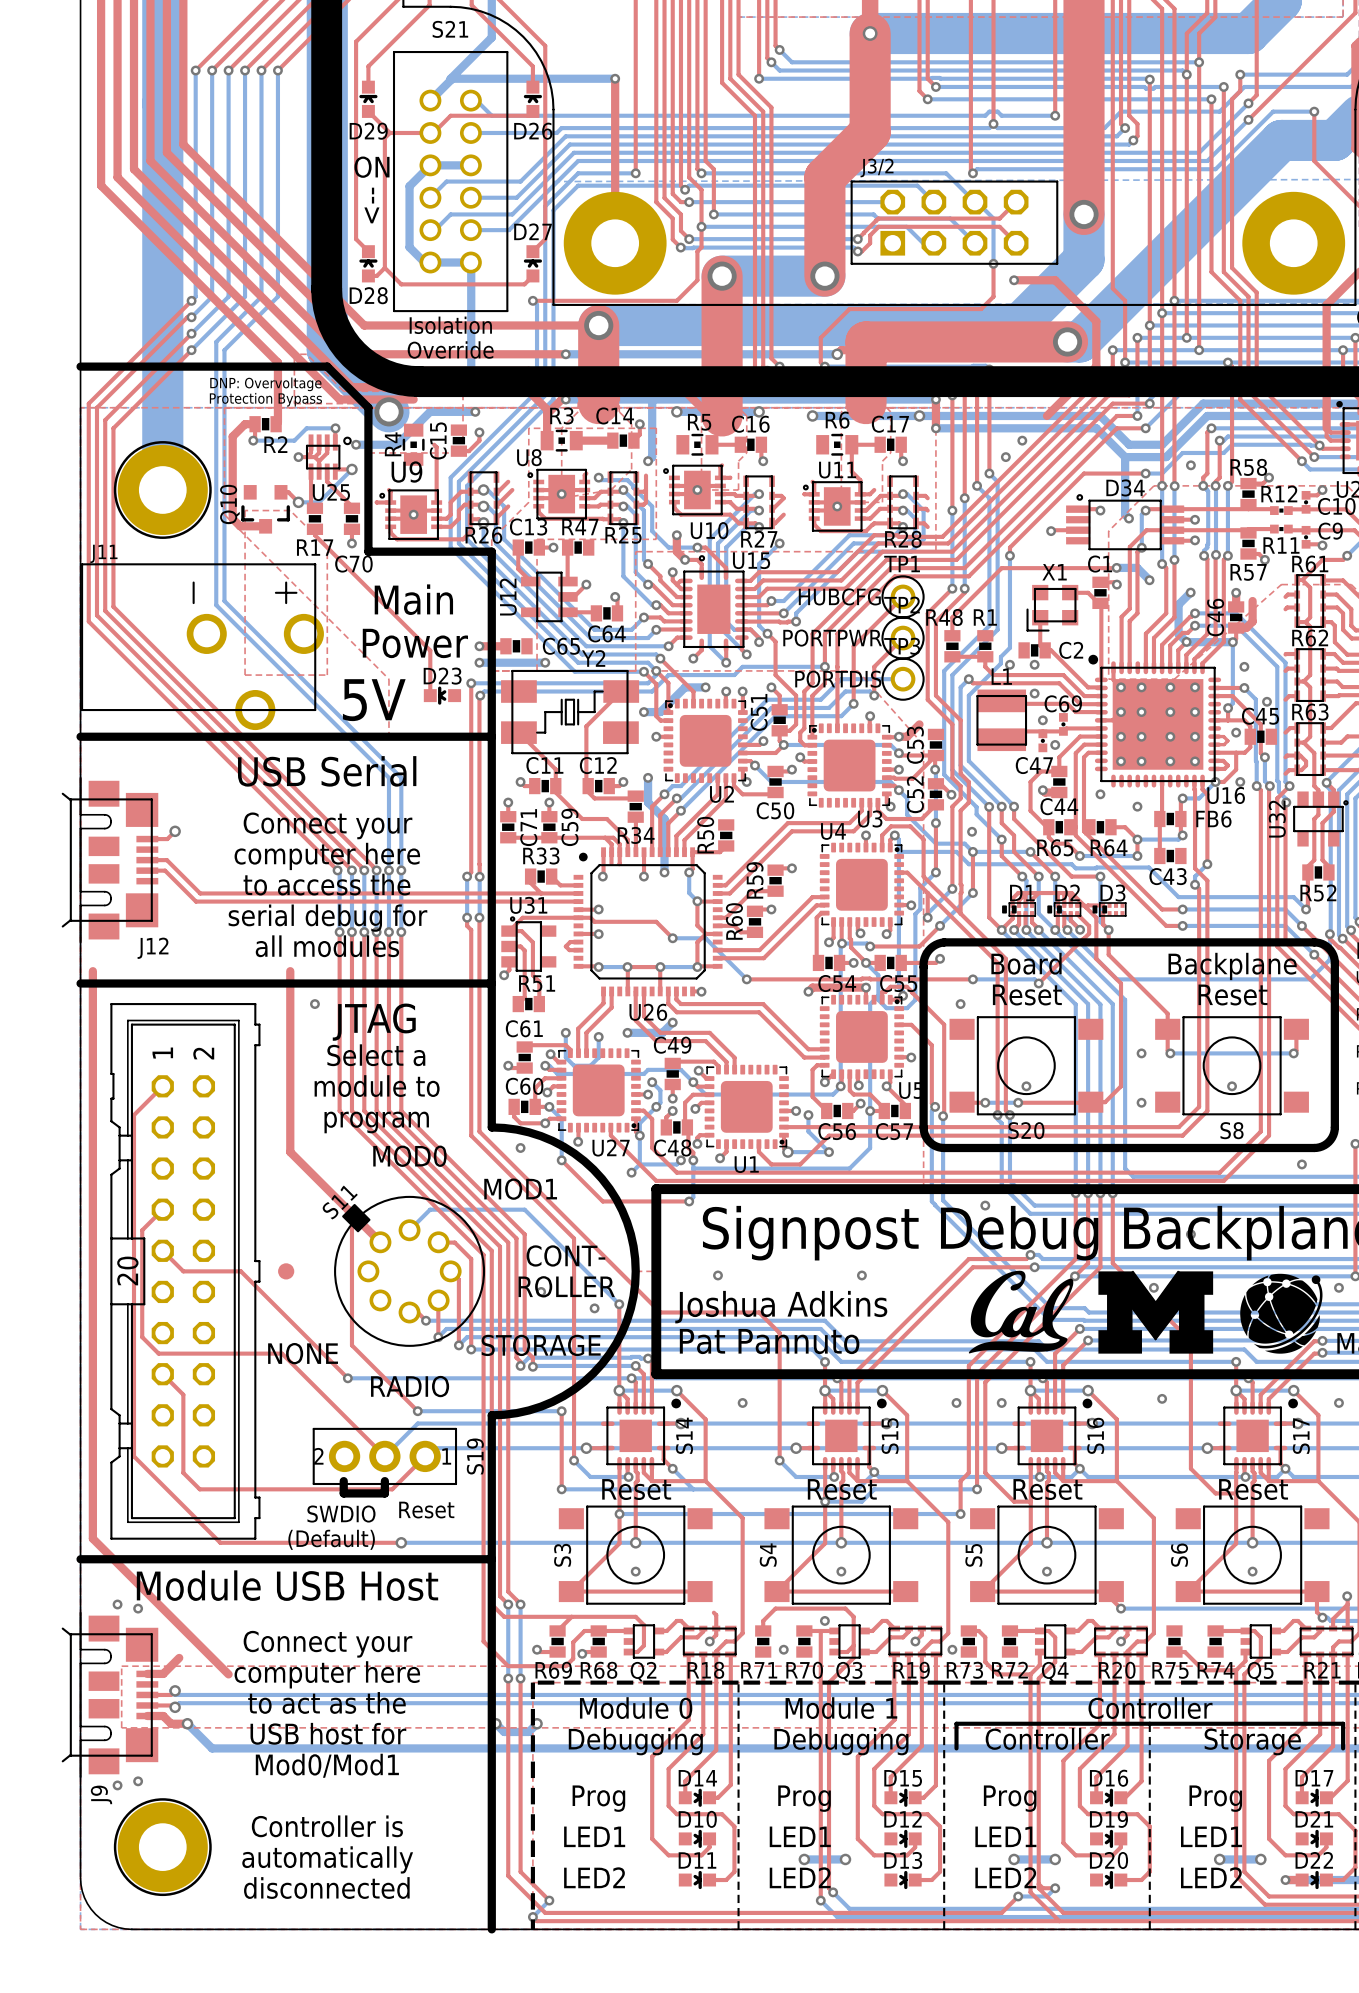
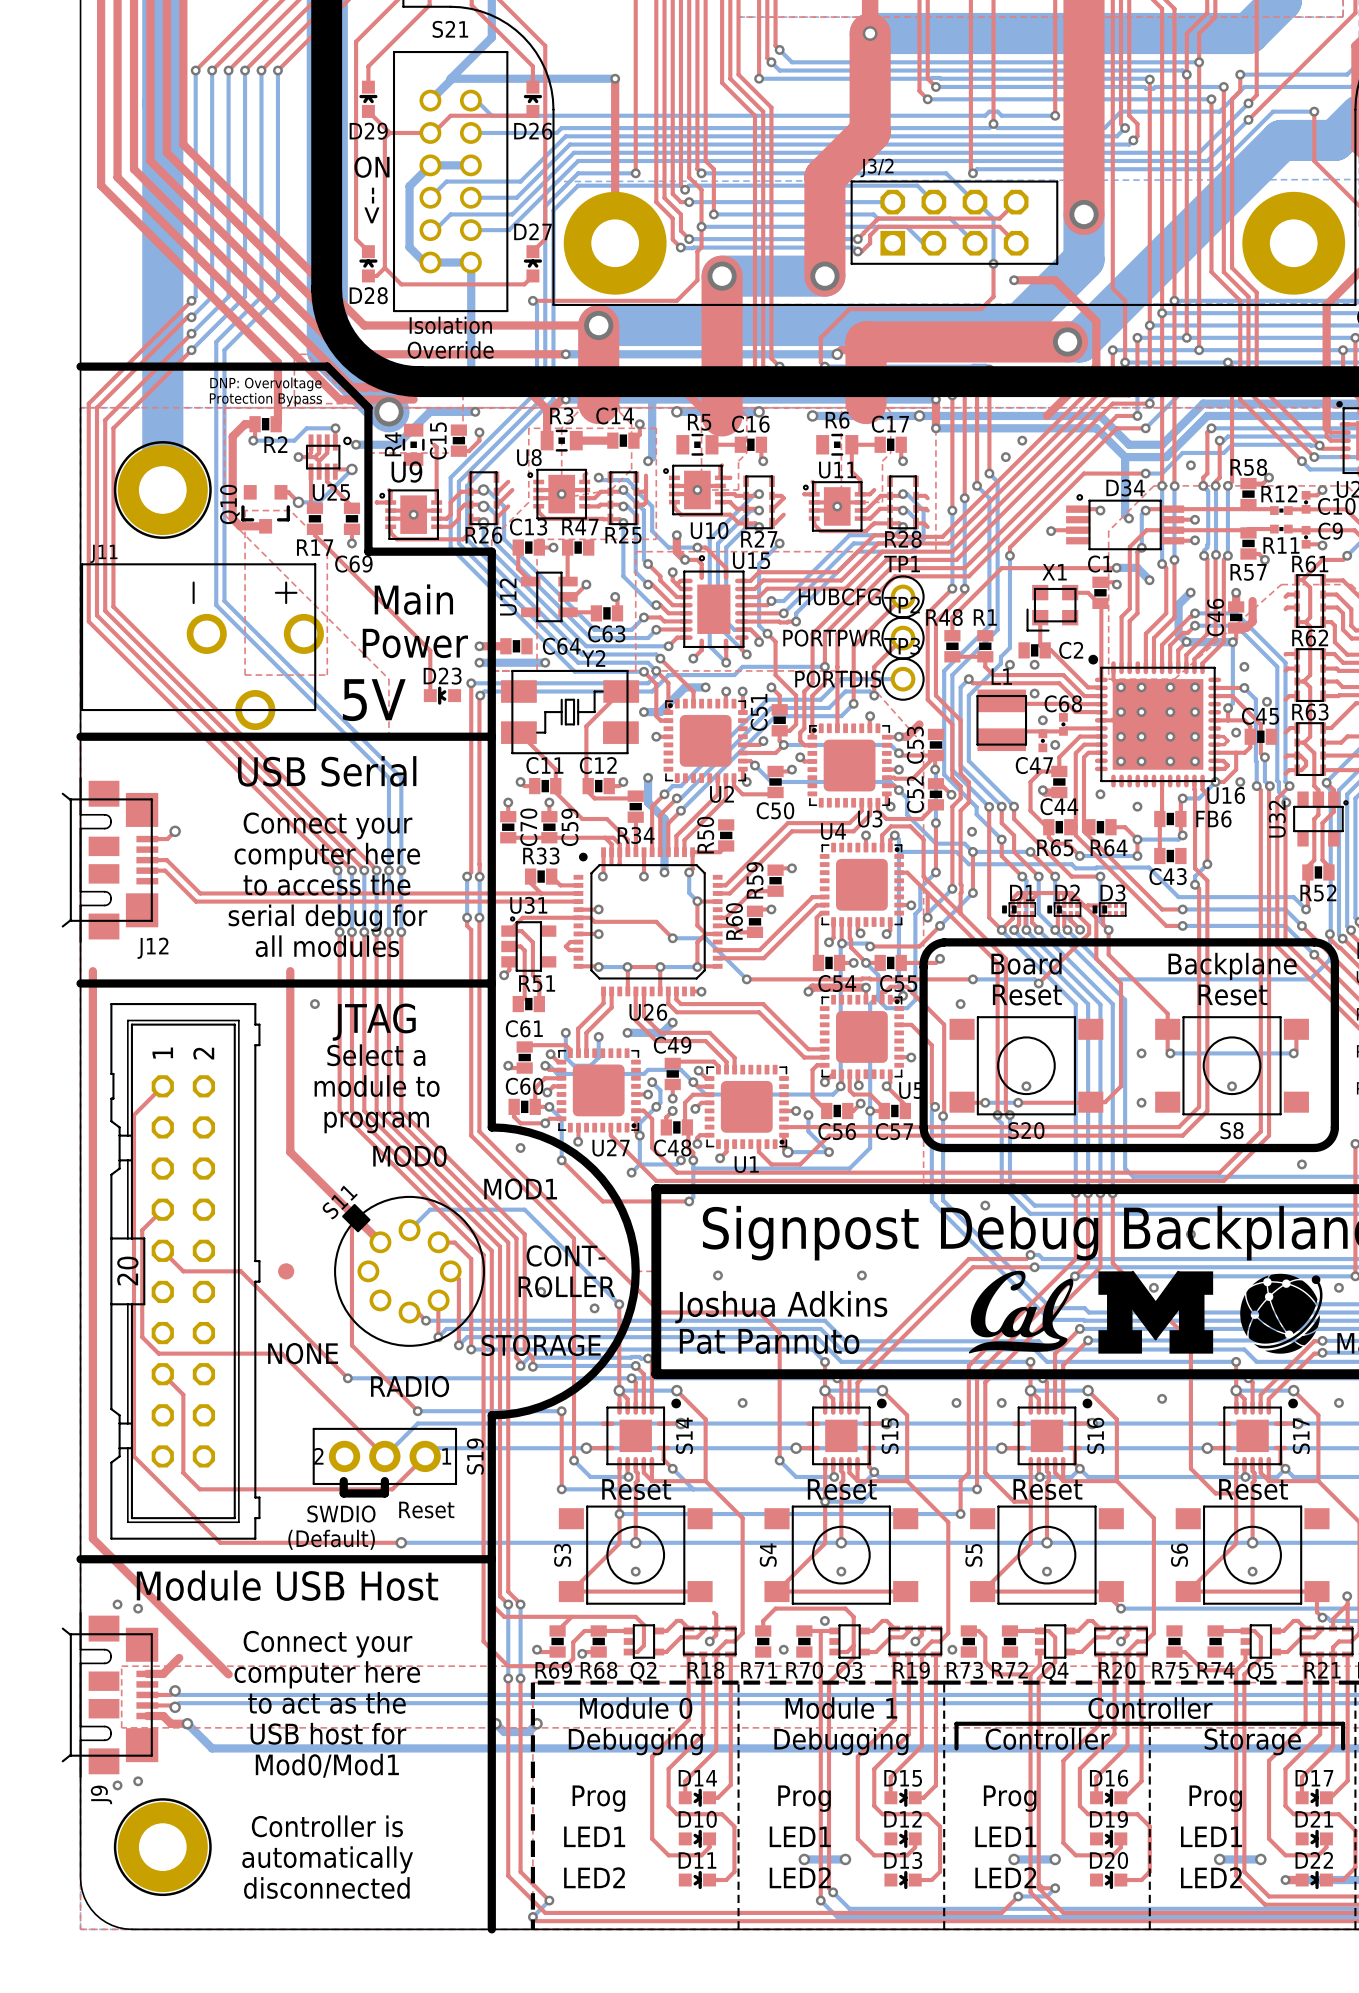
C70 name: C70 (353, 564) -> C69 (353, 564)
C64 name: C64 (606, 633) -> C63 (606, 633)
C65 name: C65 (561, 646) -> C64 (561, 646)
C69 name: C69 (1063, 703) -> C68 (1063, 703)
C71 name: C71 (528, 827) -> C70 (528, 827)

